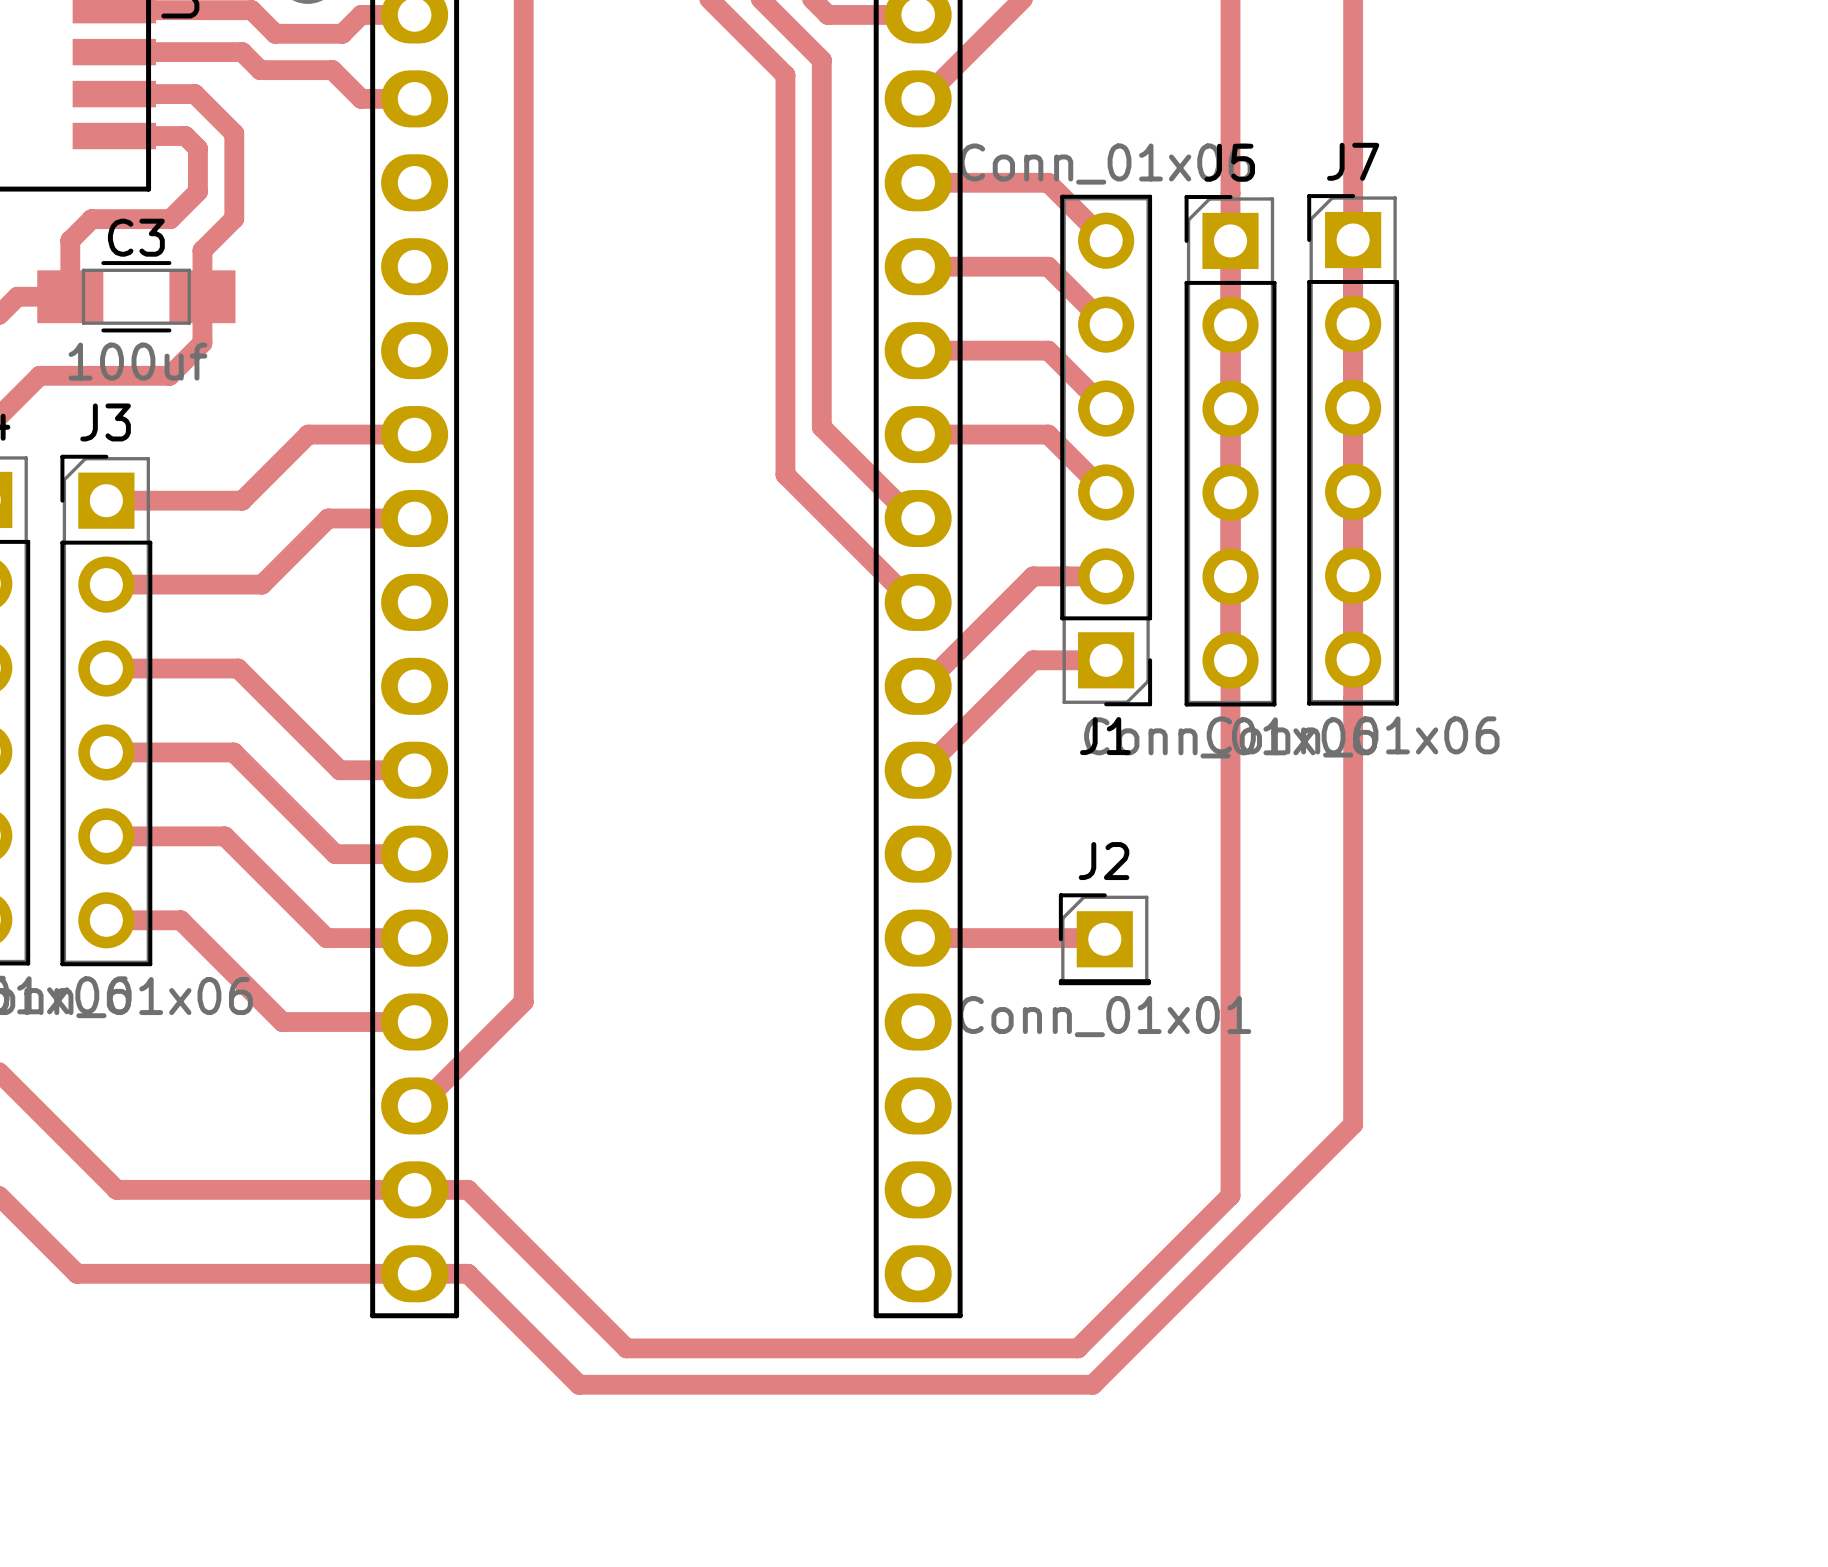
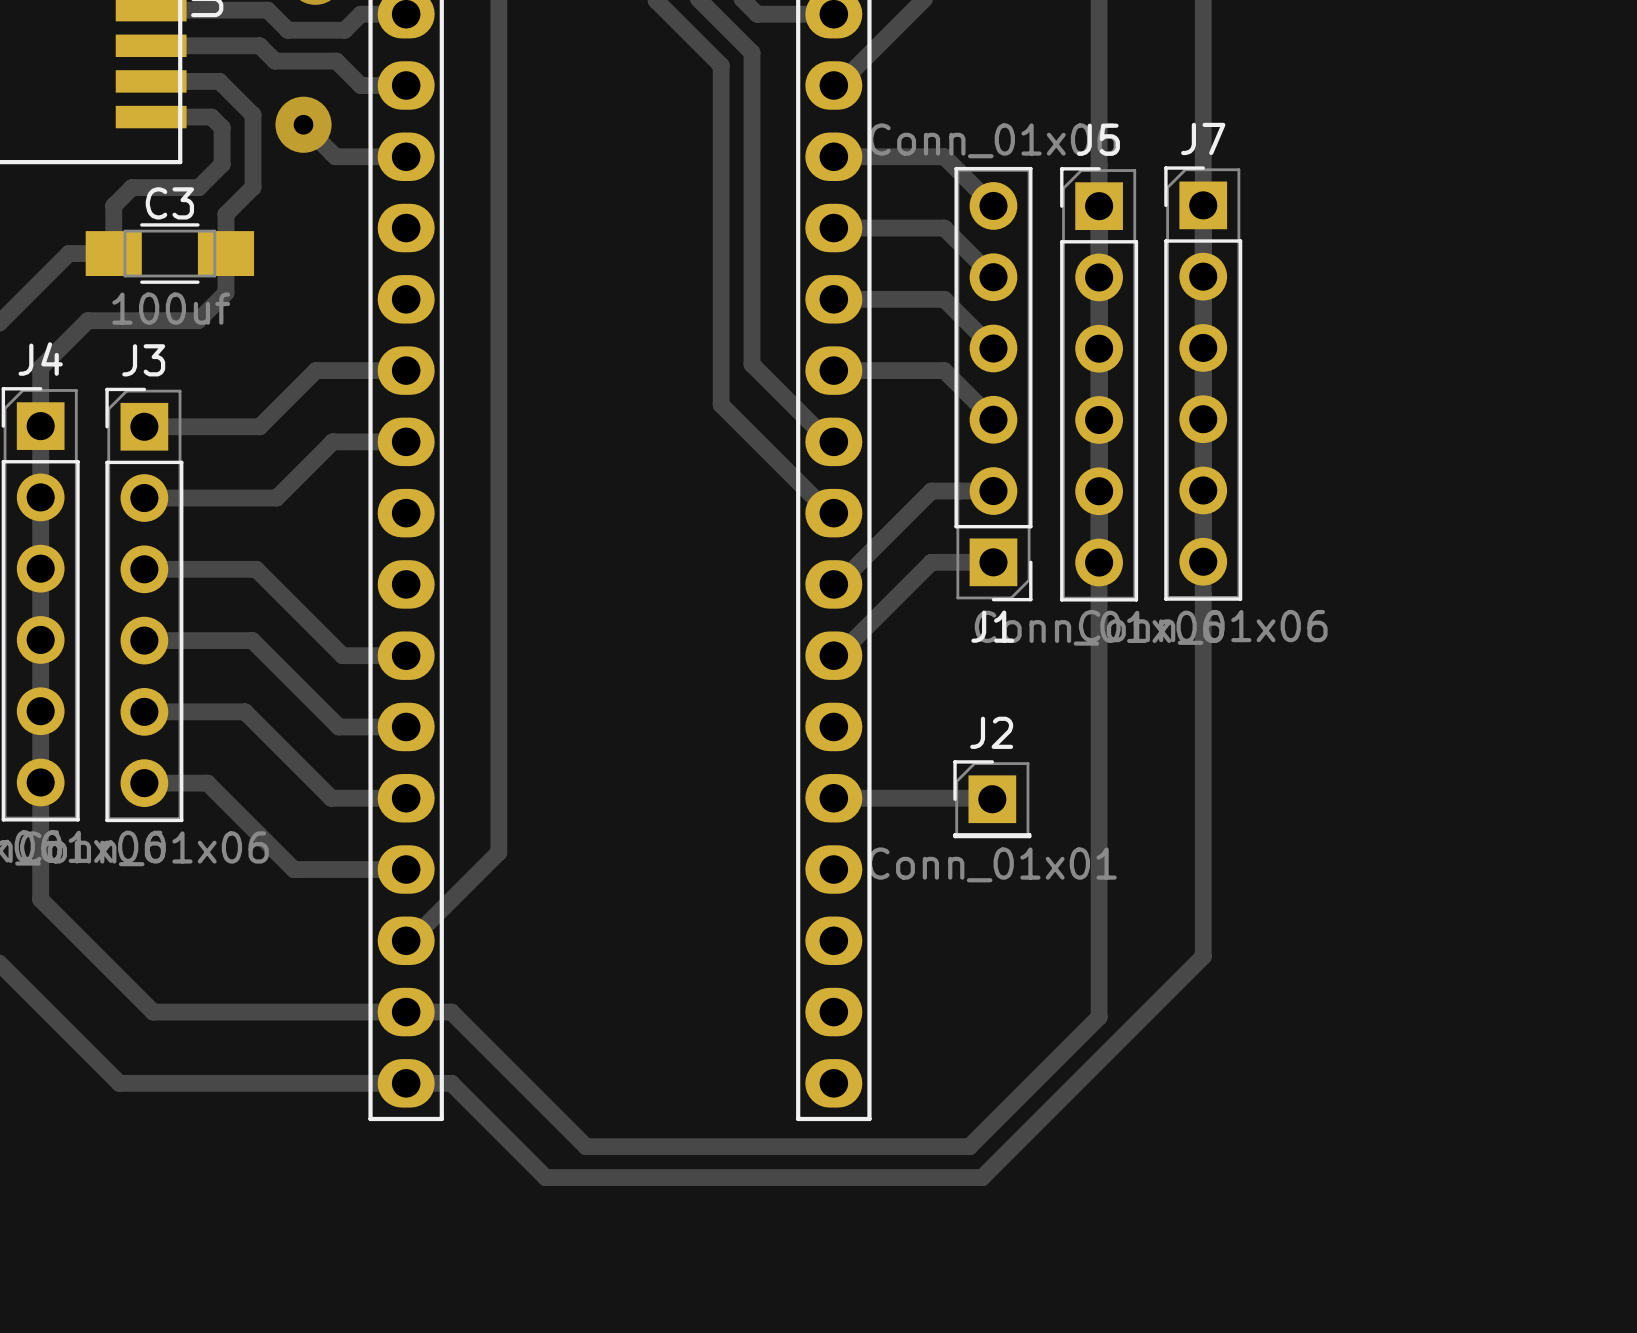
track: none -> (303, 124) (335, 156) (405, 157)
via: none -> (303, 124)

